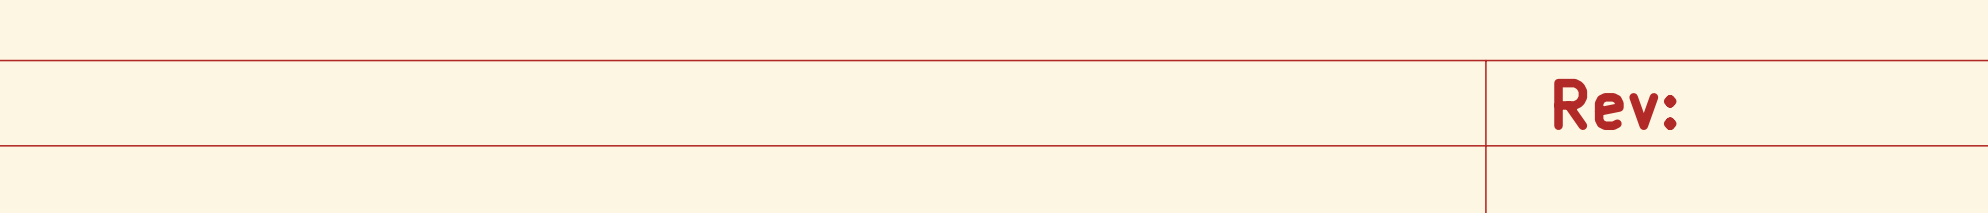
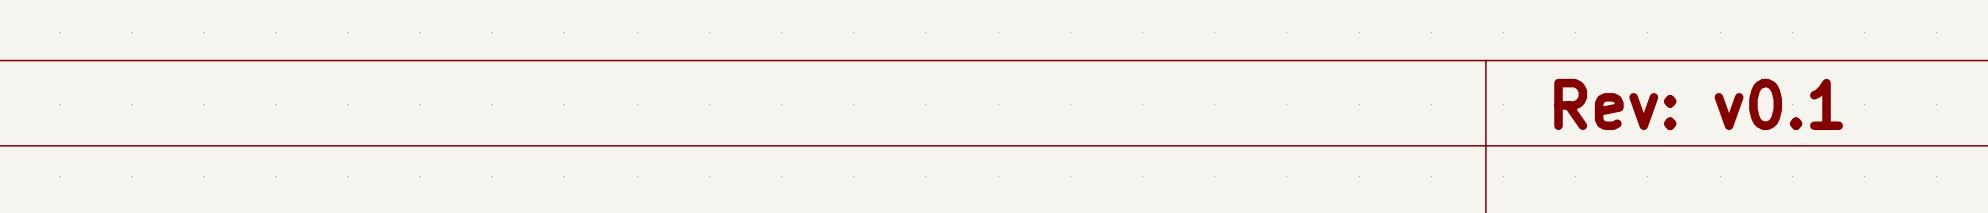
title block: Rev: (1615, 104) -> Rev: v0.1 (1698, 104)

